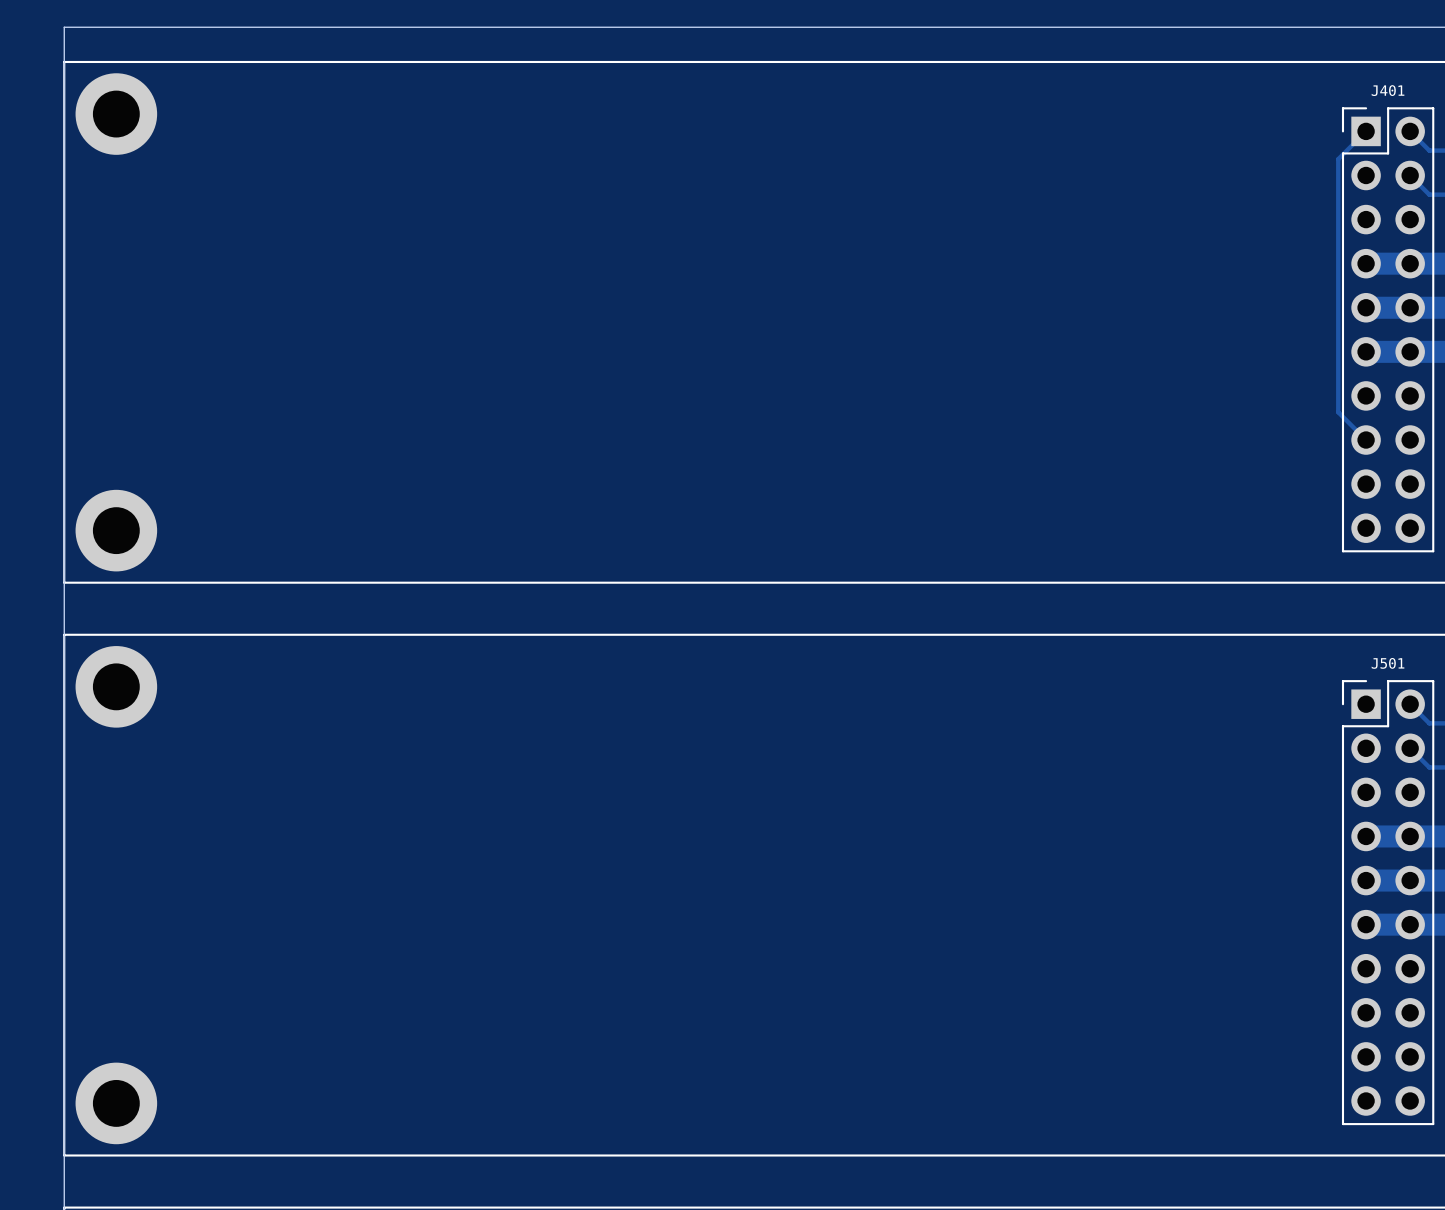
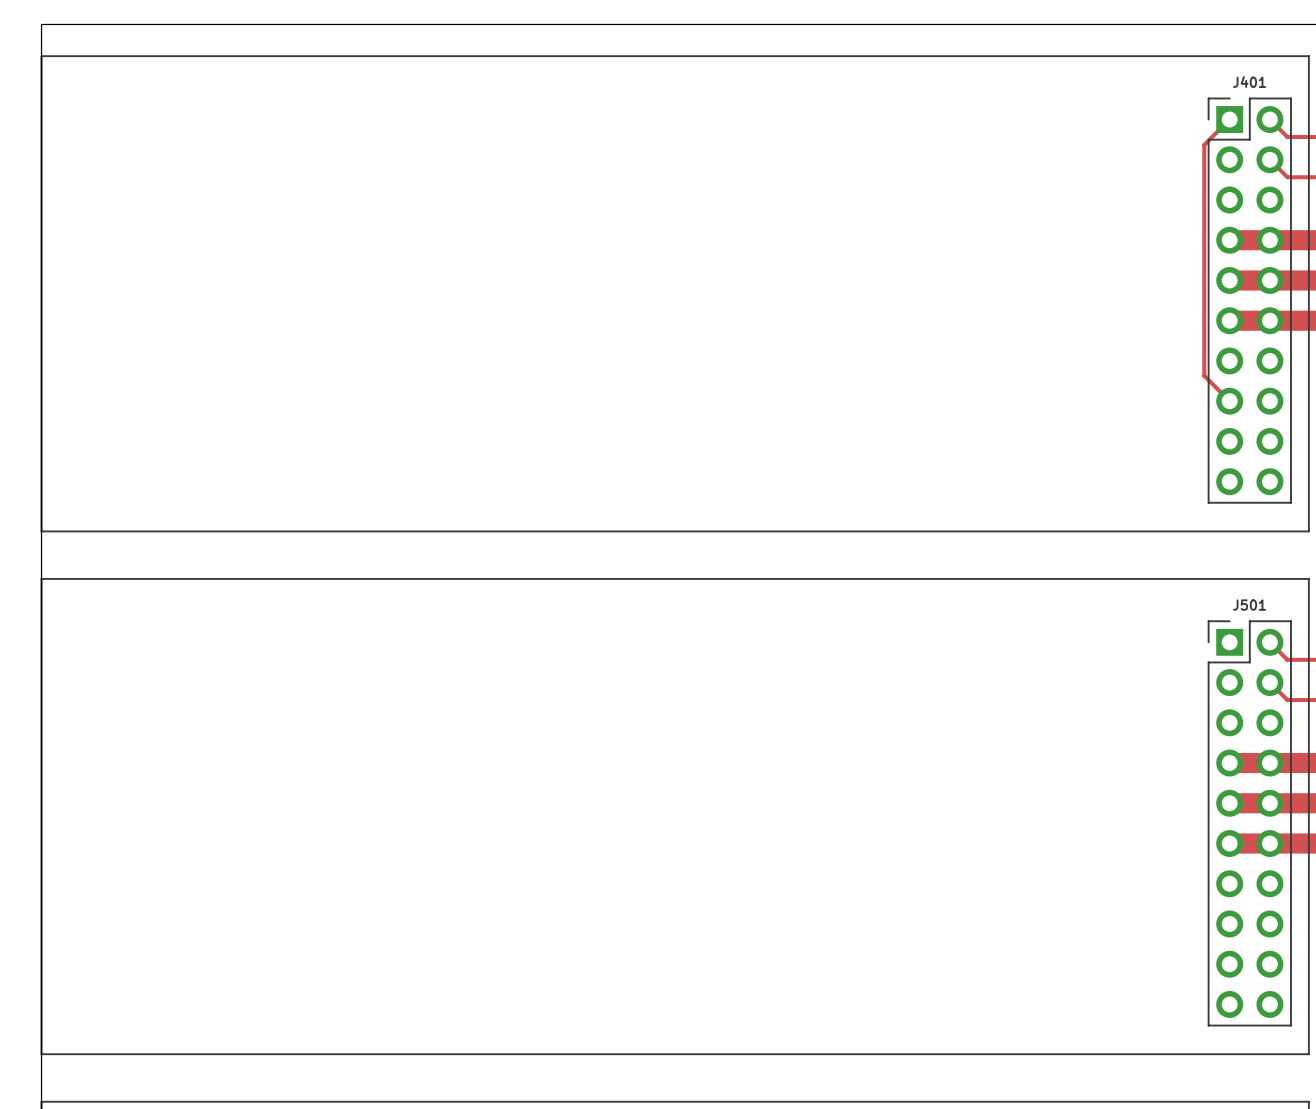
part: (116, 114) -> none
part: (116, 530) -> none
part: (116, 686) -> none
part: (116, 1103) -> none

